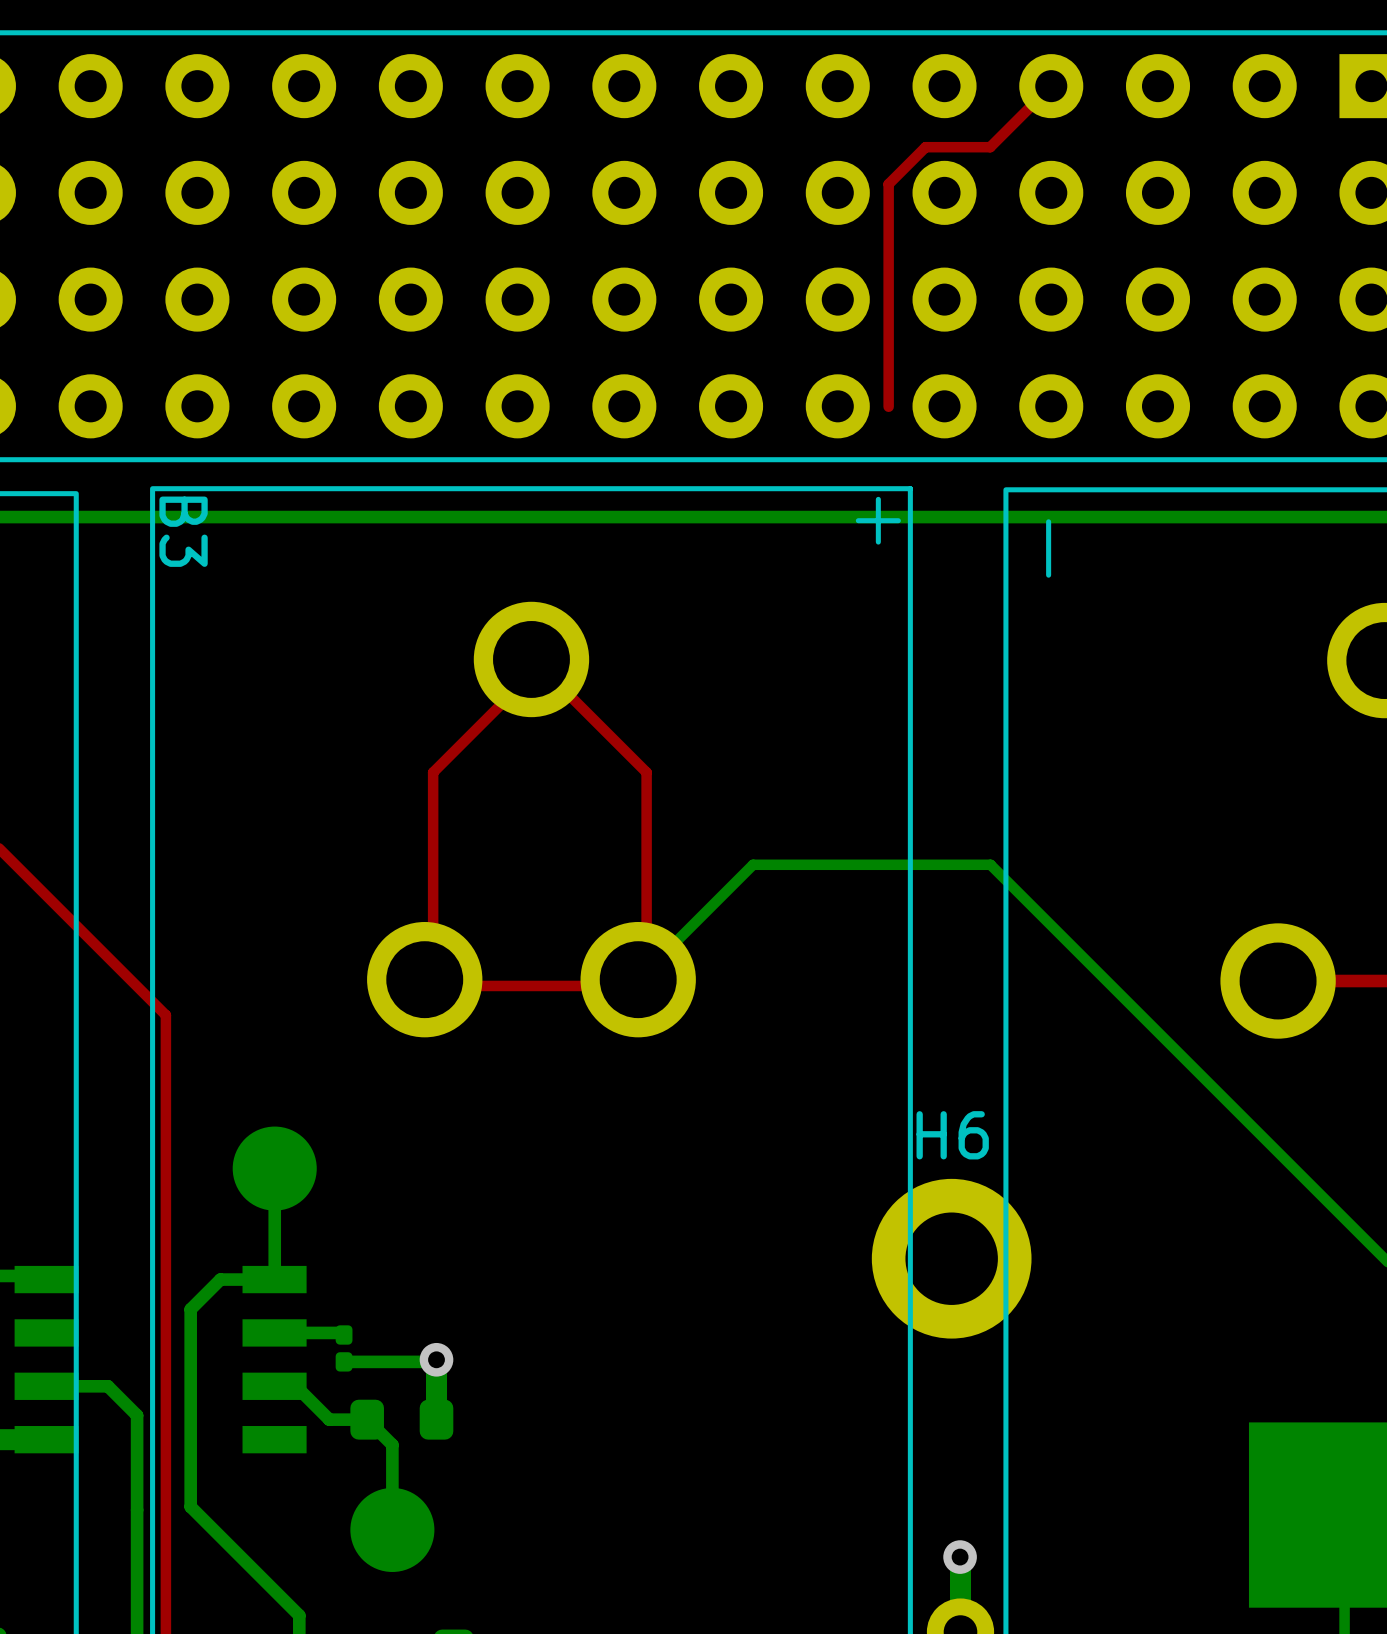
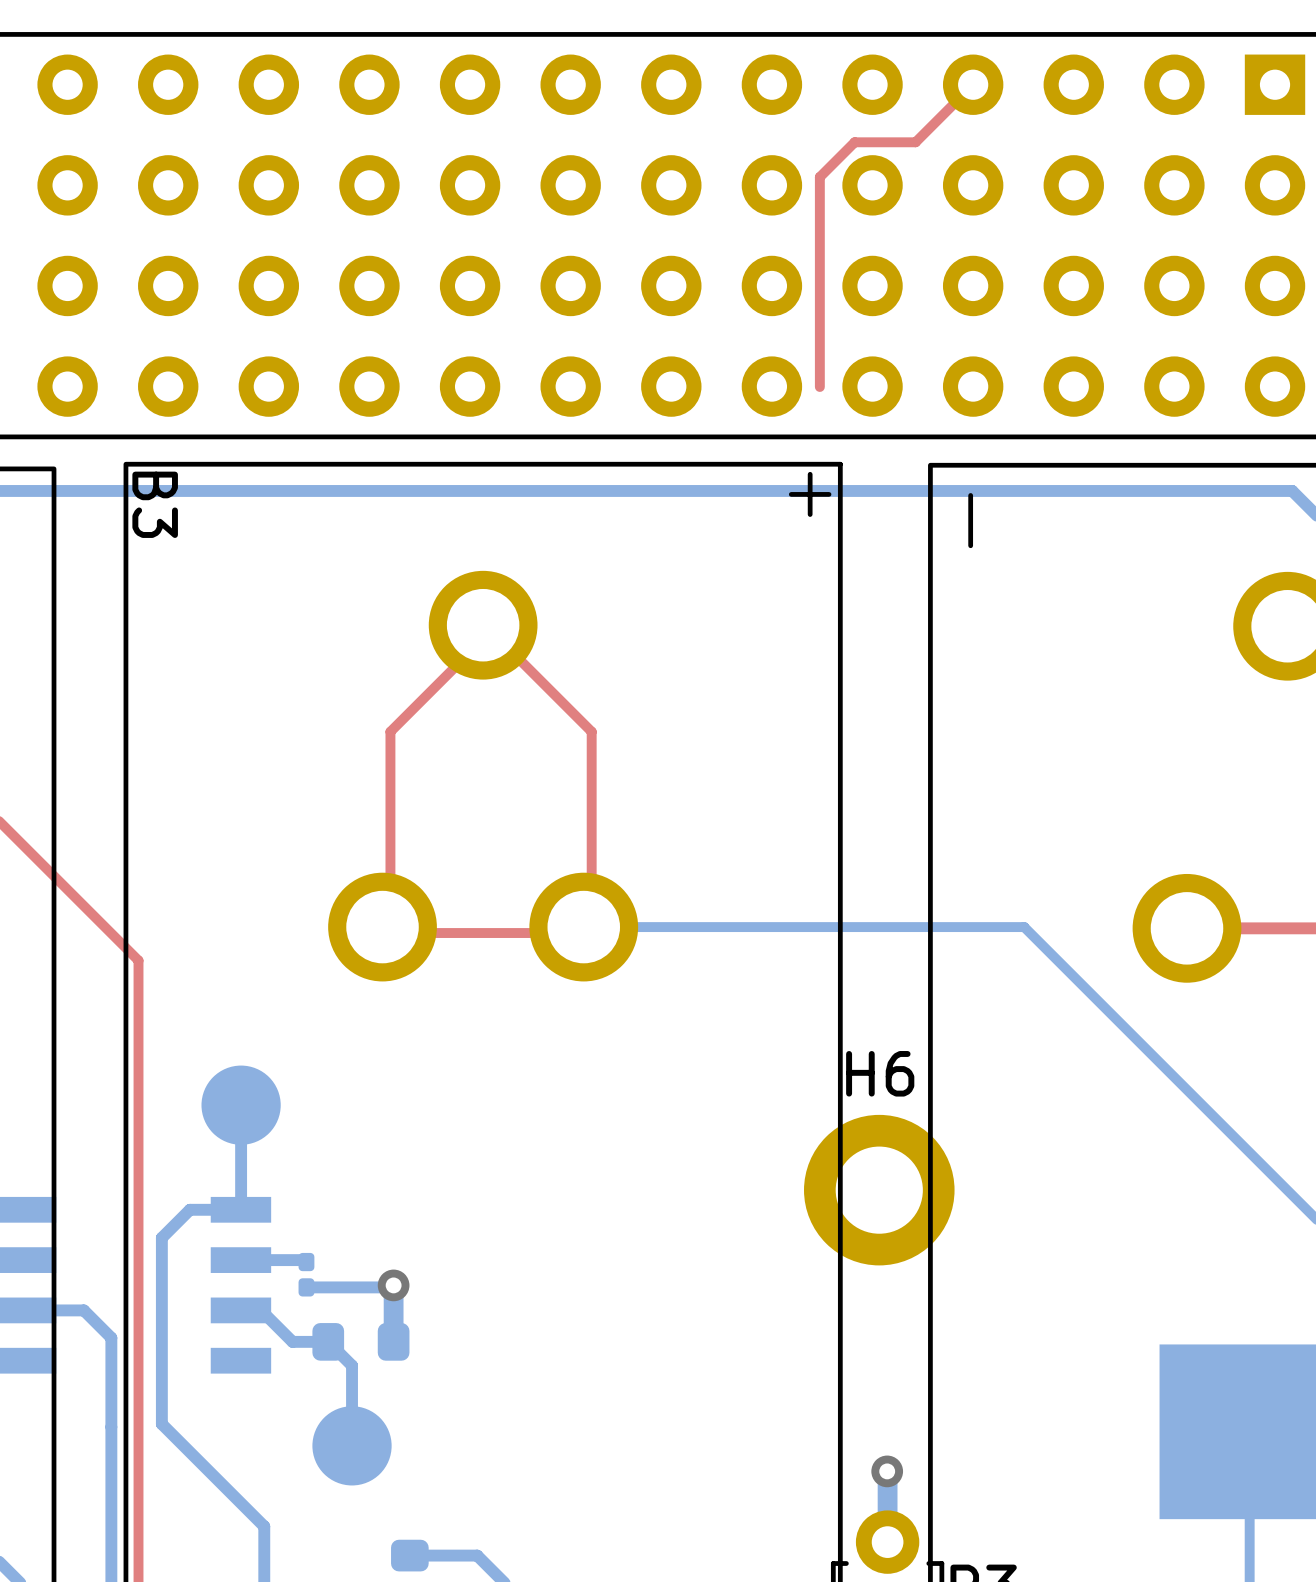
bottom track: (638, 979) (753, 864) (990, 864) (1105, 979) -> (583, 927) (1024, 927)

